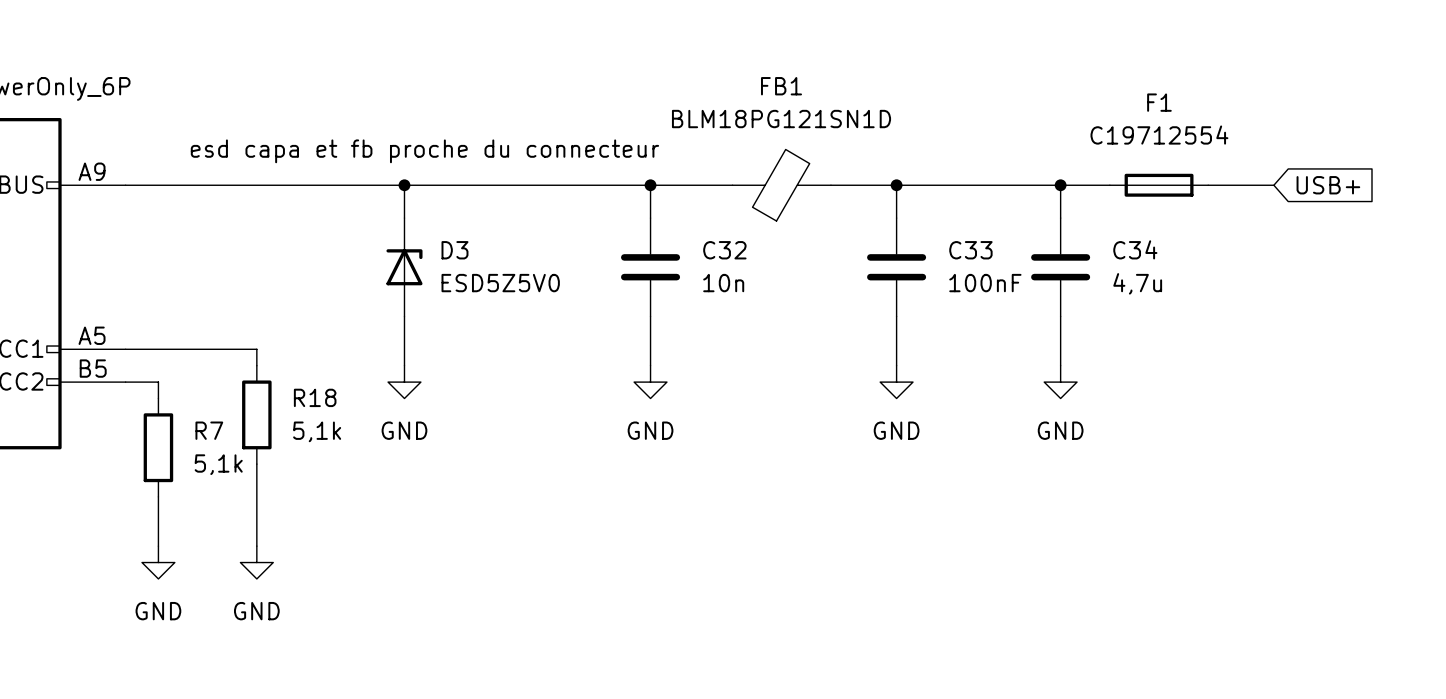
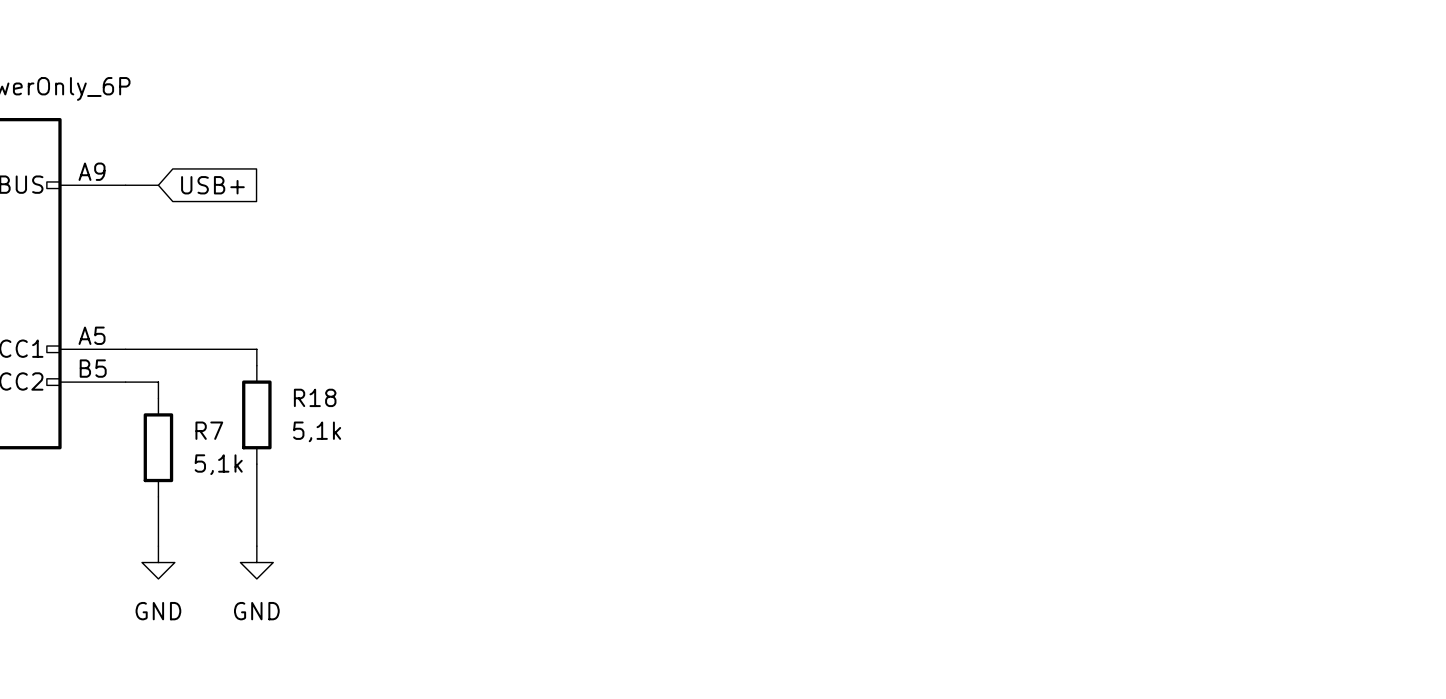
text: esd capa et fb proche du connecteur (424, 151) -> none
wire: (158, 185) (732, 185) -> none
global label: none -> USB+ (212, 185)
wire: (404, 185) (404, 218) -> none
junction: (404, 185) -> none
wire: (650, 185) (650, 218) -> none
junction: (650, 185) -> none
FB1: BLM18PG121SN1D (781, 185) -> none
wire: (830, 185) (1109, 185) -> none
wire: (896, 185) (896, 218) -> none
junction: (896, 185) -> none
wire: (1060, 185) (1060, 218) -> none
junction: (1060, 185) -> none
F1: C19712554 (1159, 185) -> none
wire: (1208, 185) (1273, 185) -> none
global label: USB+ (1328, 185) -> none
D3: ESD5Z5V0 (404, 267) -> none
C32: 10n (650, 267) -> none
C33: 100nF (896, 267) -> none
C34: 4,7u (1060, 267) -> none
wire: (404, 316) (404, 365) -> none
wire: (650, 316) (650, 365) -> none
wire: (896, 316) (896, 365) -> none
wire: (1060, 316) (1060, 365) -> none
power symbol: GND (404, 382) -> none
power symbol: GND (650, 382) -> none
power symbol: GND (896, 382) -> none
power symbol: GND (1060, 382) -> none

